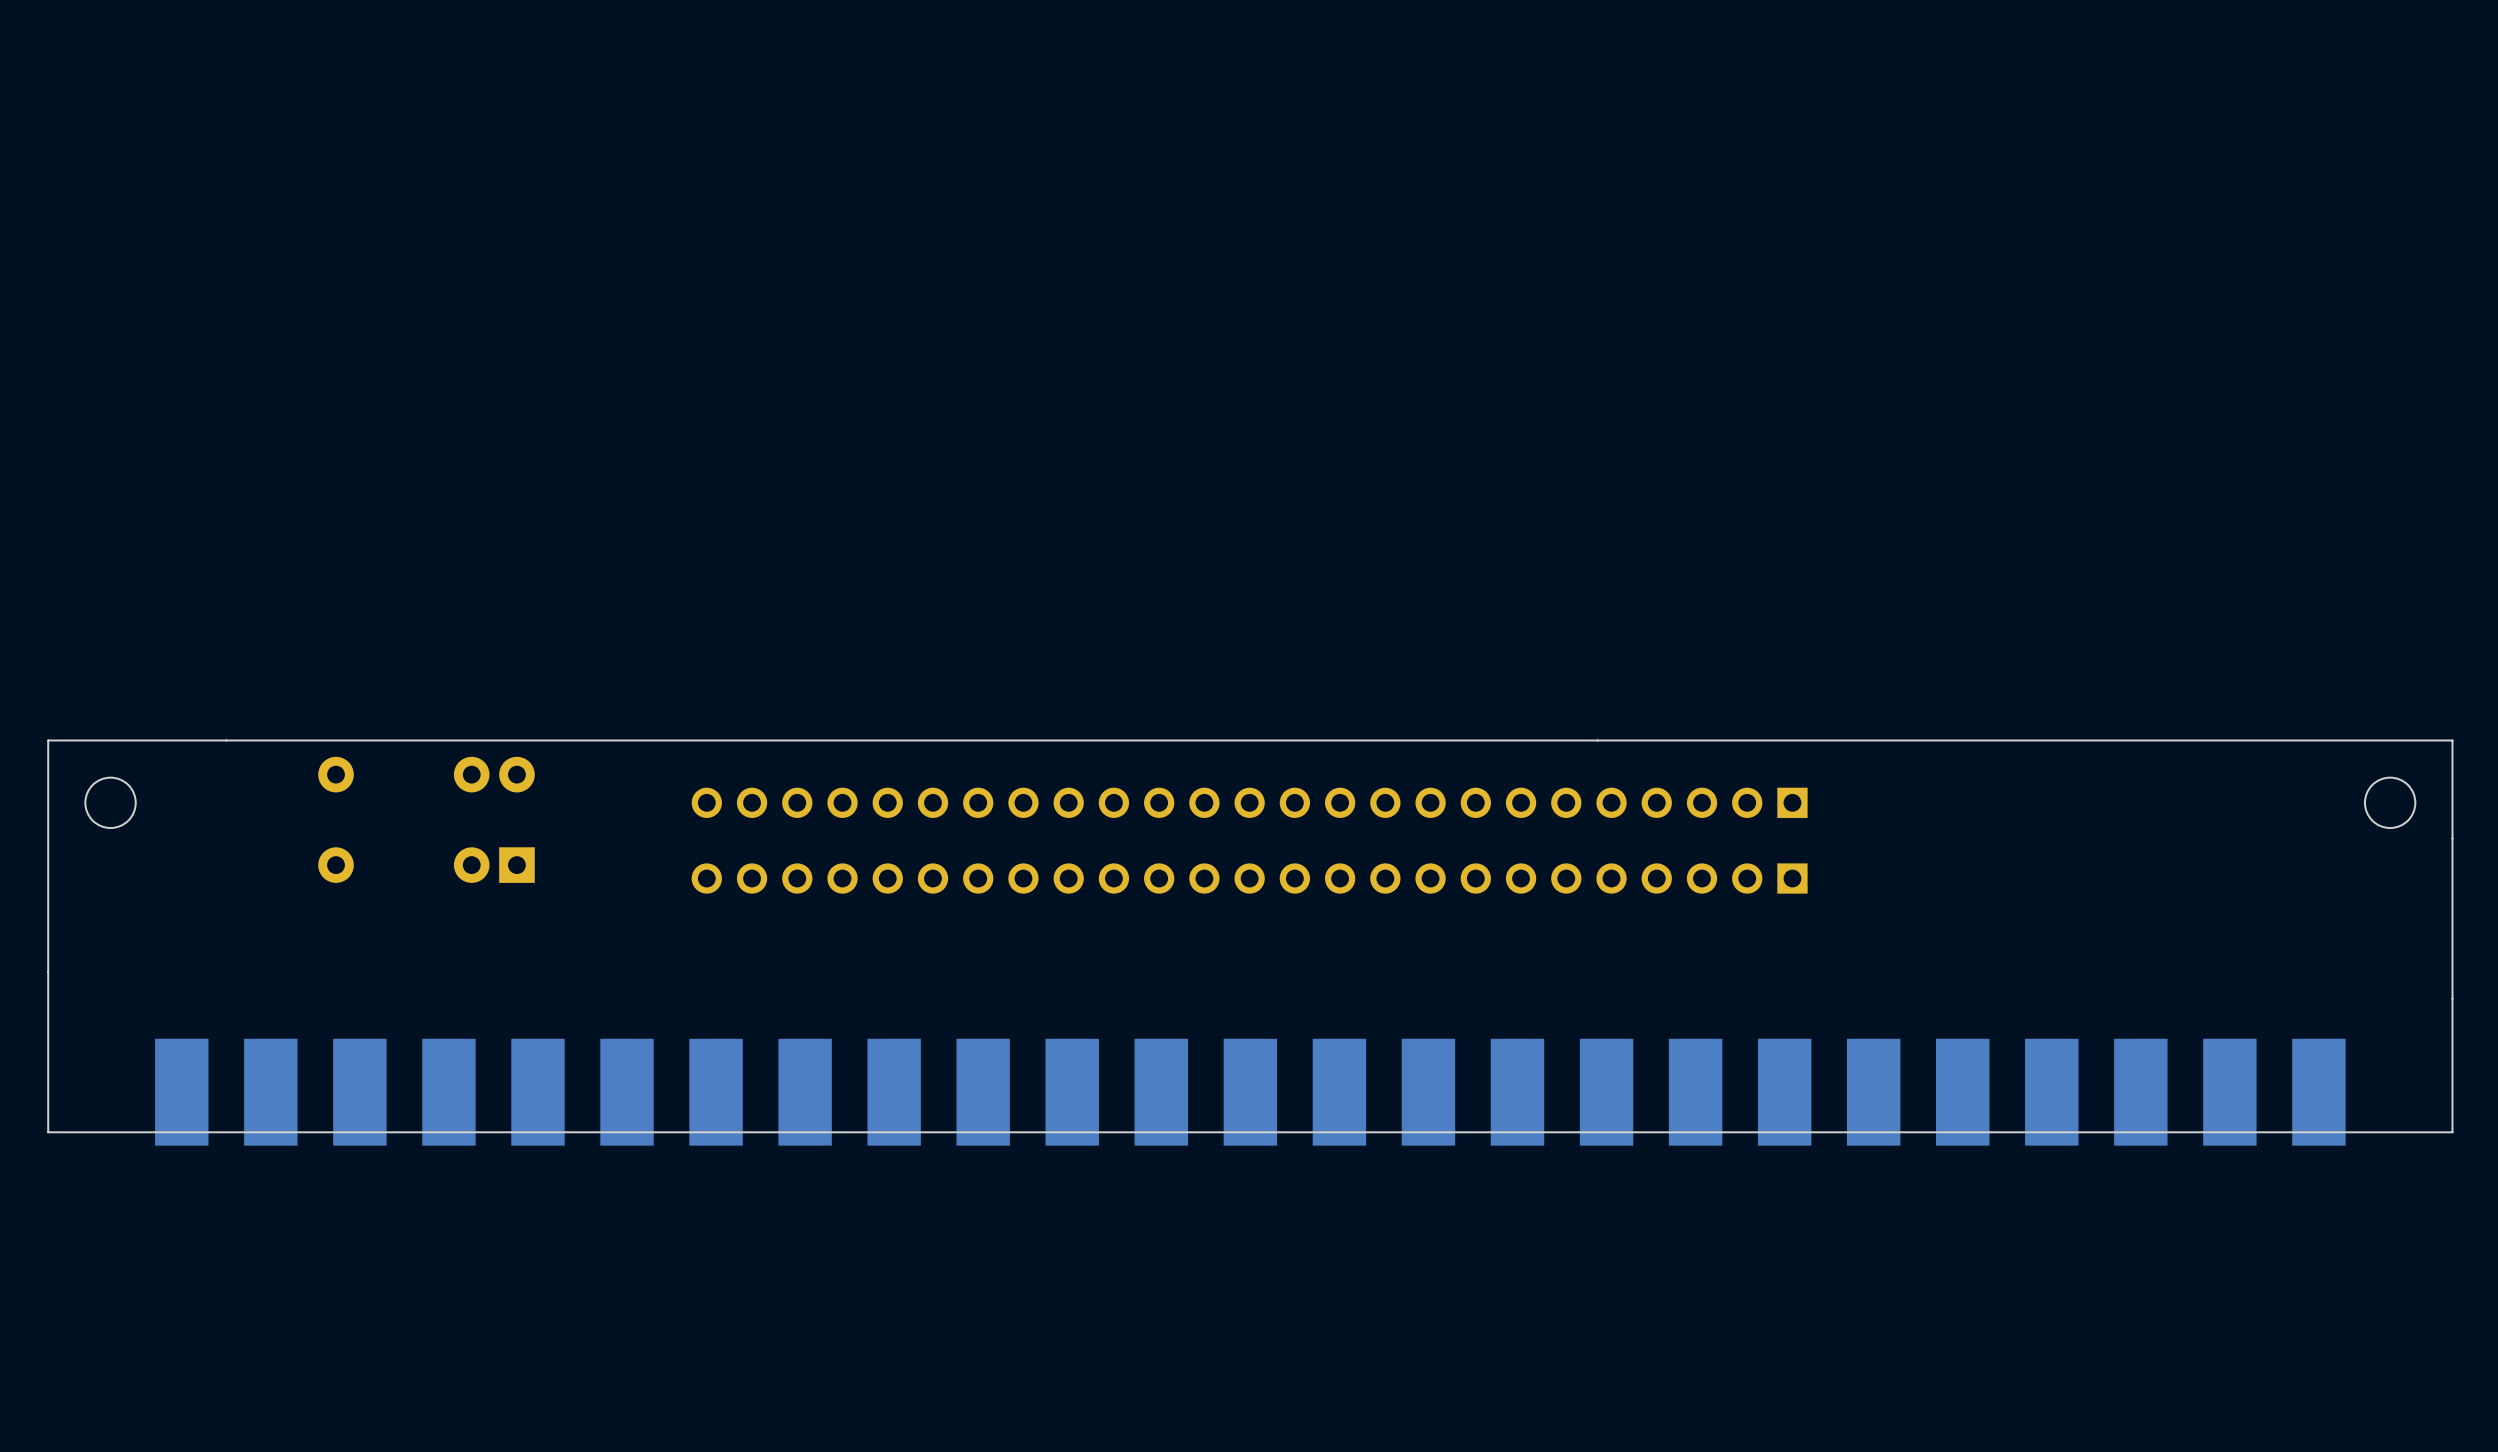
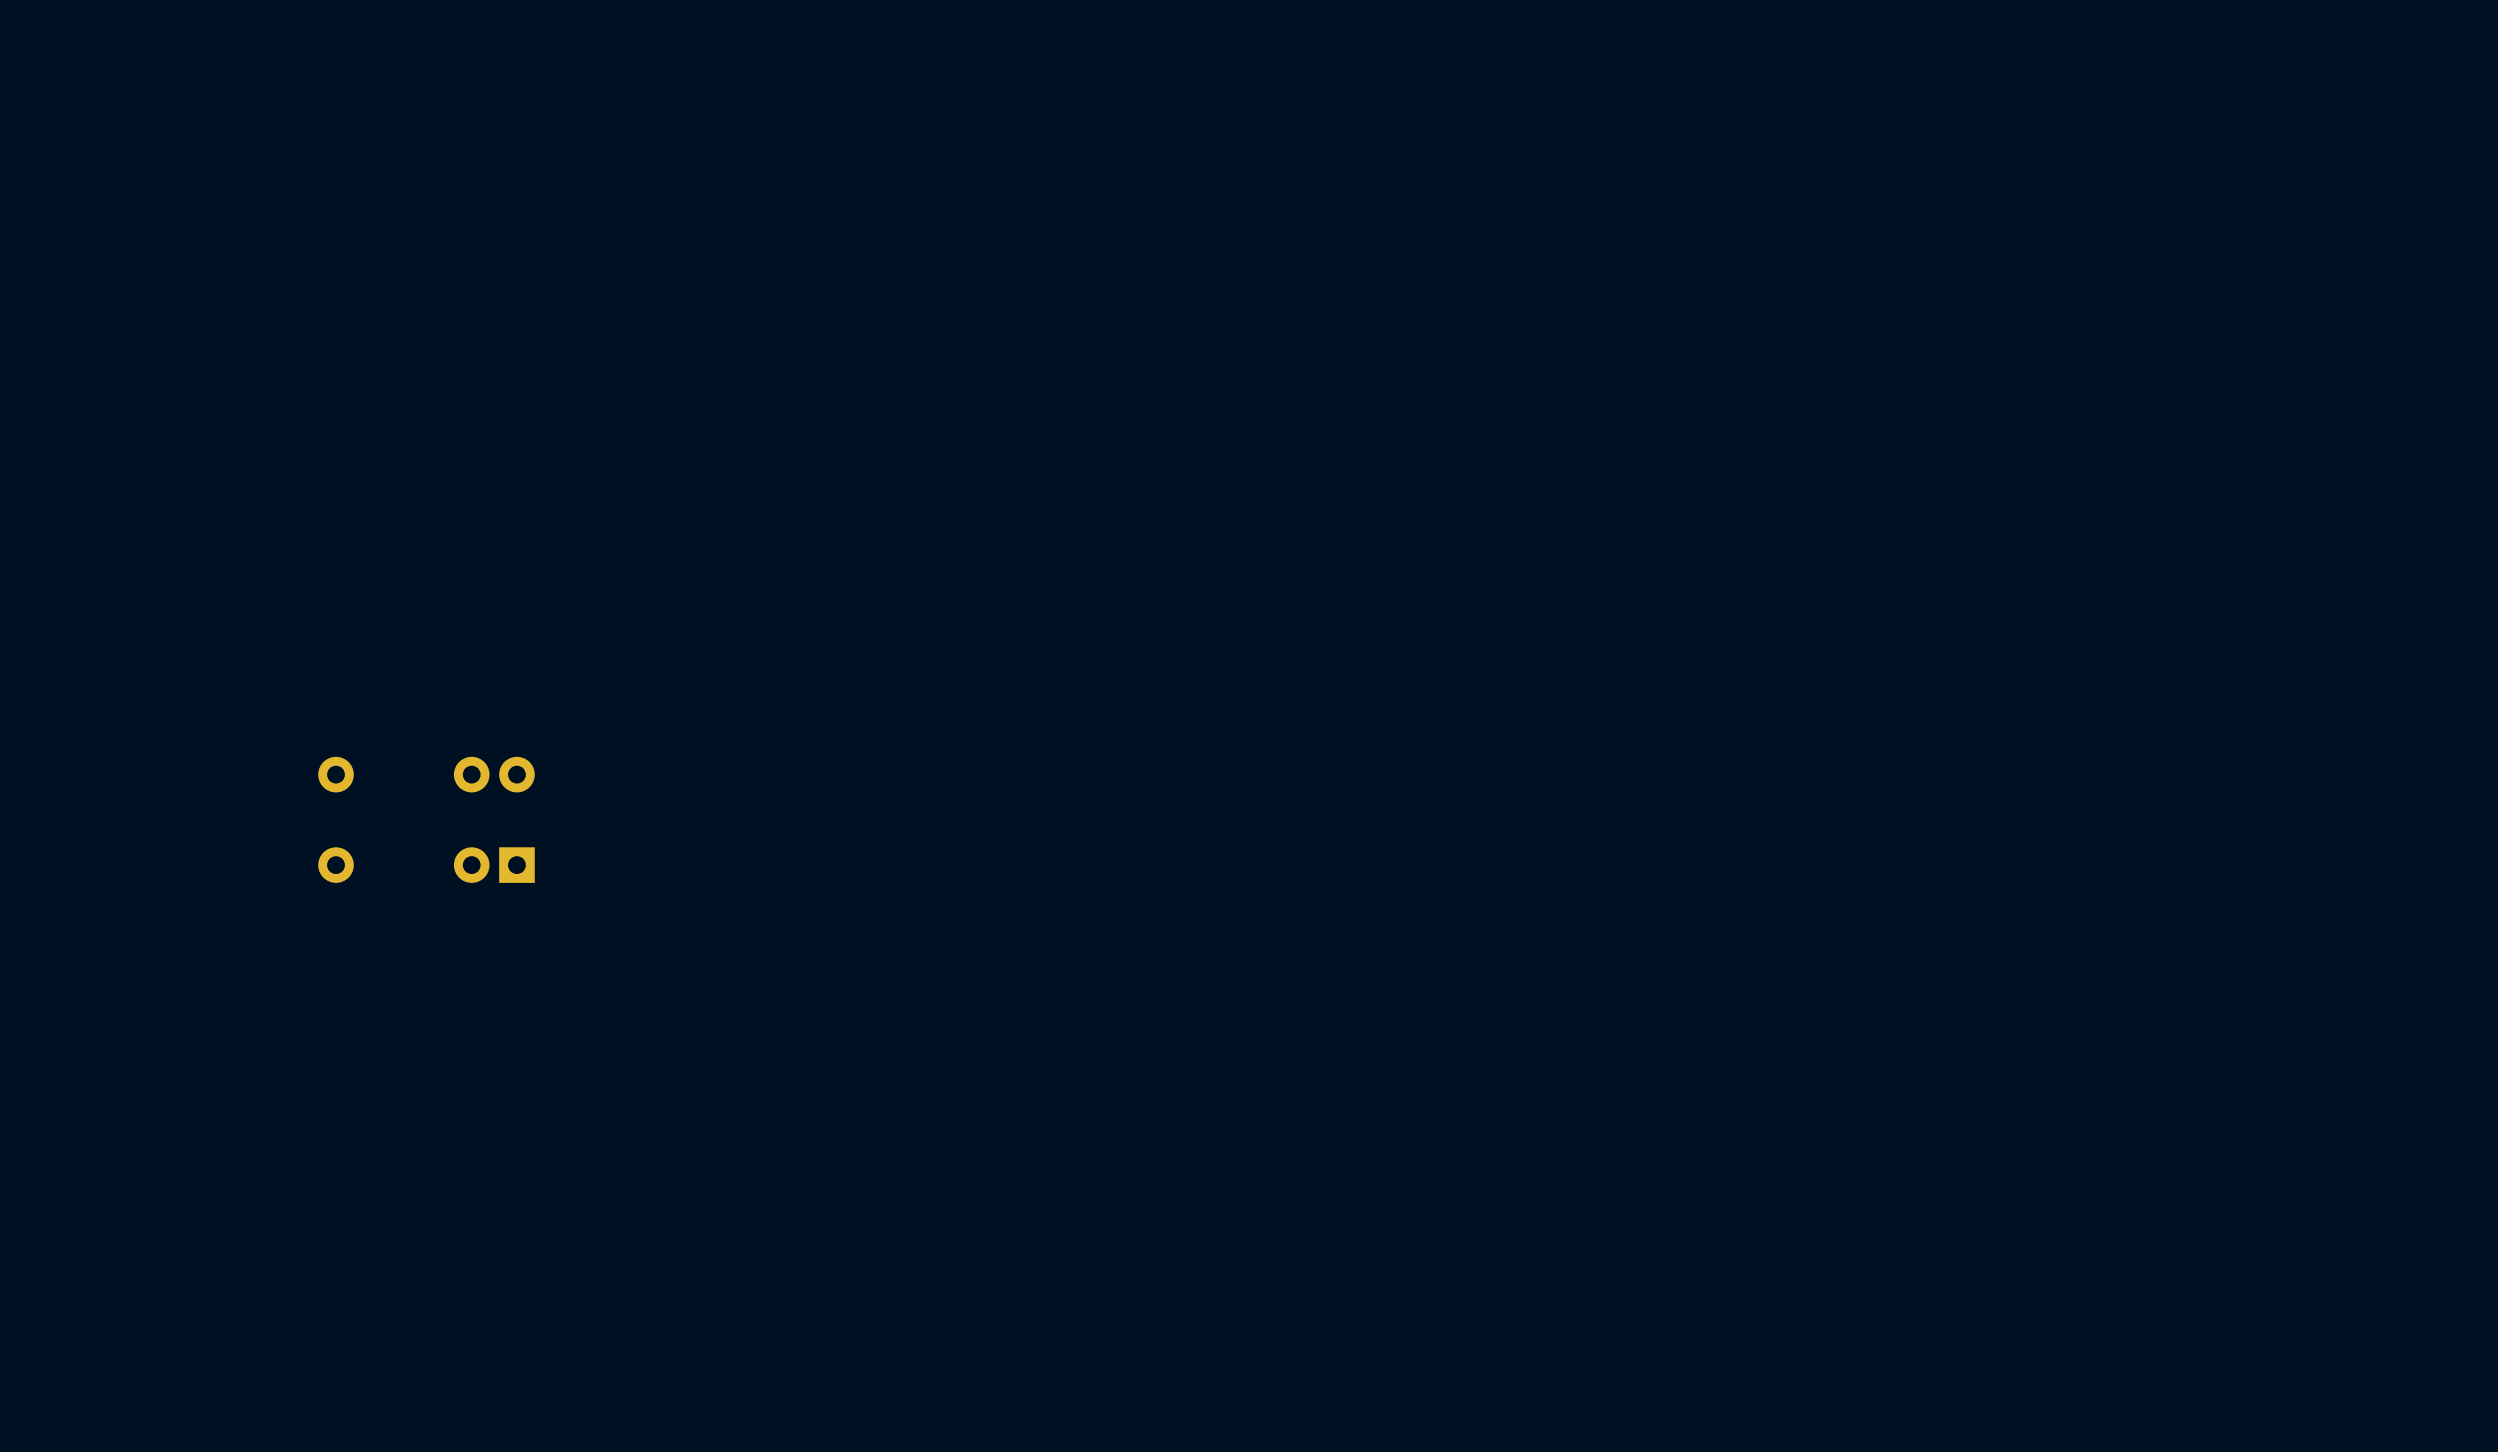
board edge: (2452, 740) (2452, 1132) (48, 1132) (48, 740) (2452, 740) -> none
round board edge: [84, 777, 137, 829] -> none
round board edge: [2364, 777, 2416, 829] -> none
part: (1249, 802) -> none
part: (1249, 878) -> none
part: (1250, 1092) -> none

